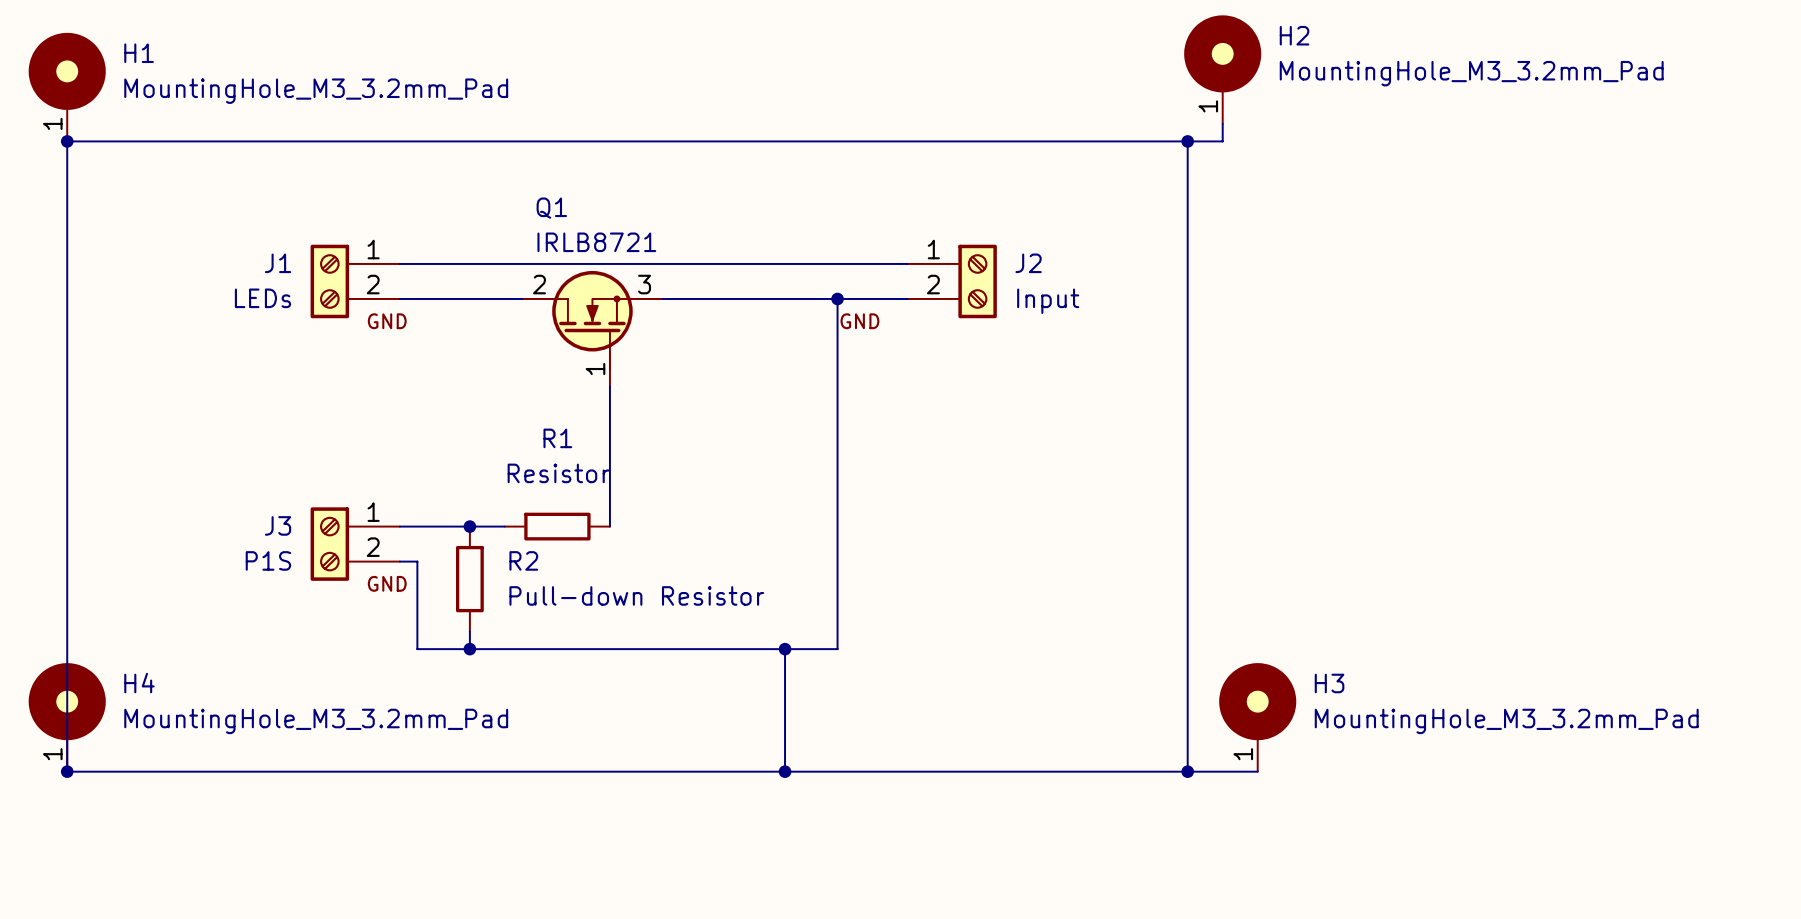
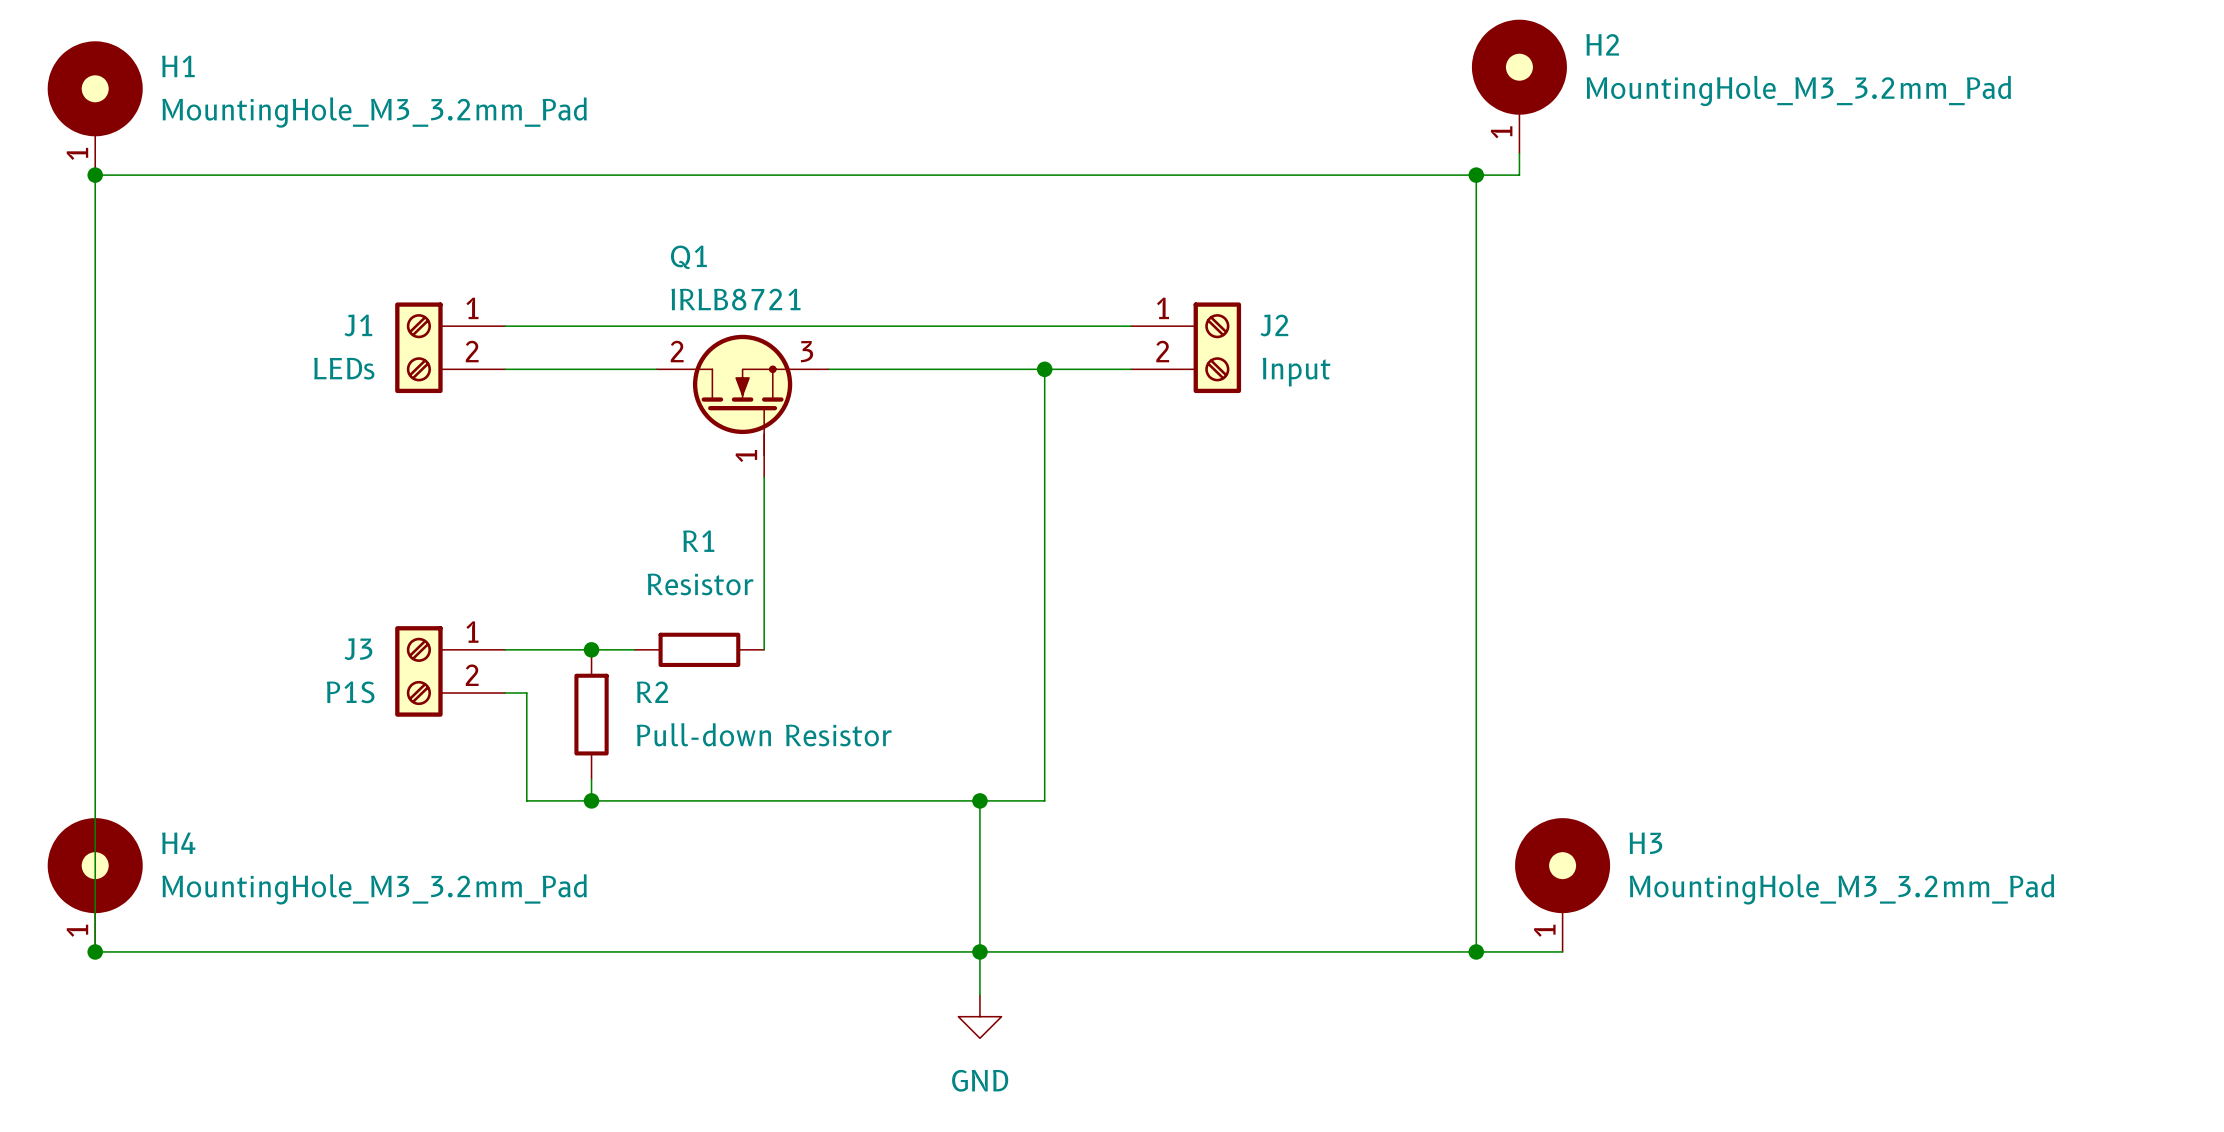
label: GND (387, 321) -> none
label: GND (859, 321) -> none
label: GND (387, 583) -> none
wire: none -> (979, 951) (979, 995)
power symbol: none -> GND (979, 1016)

